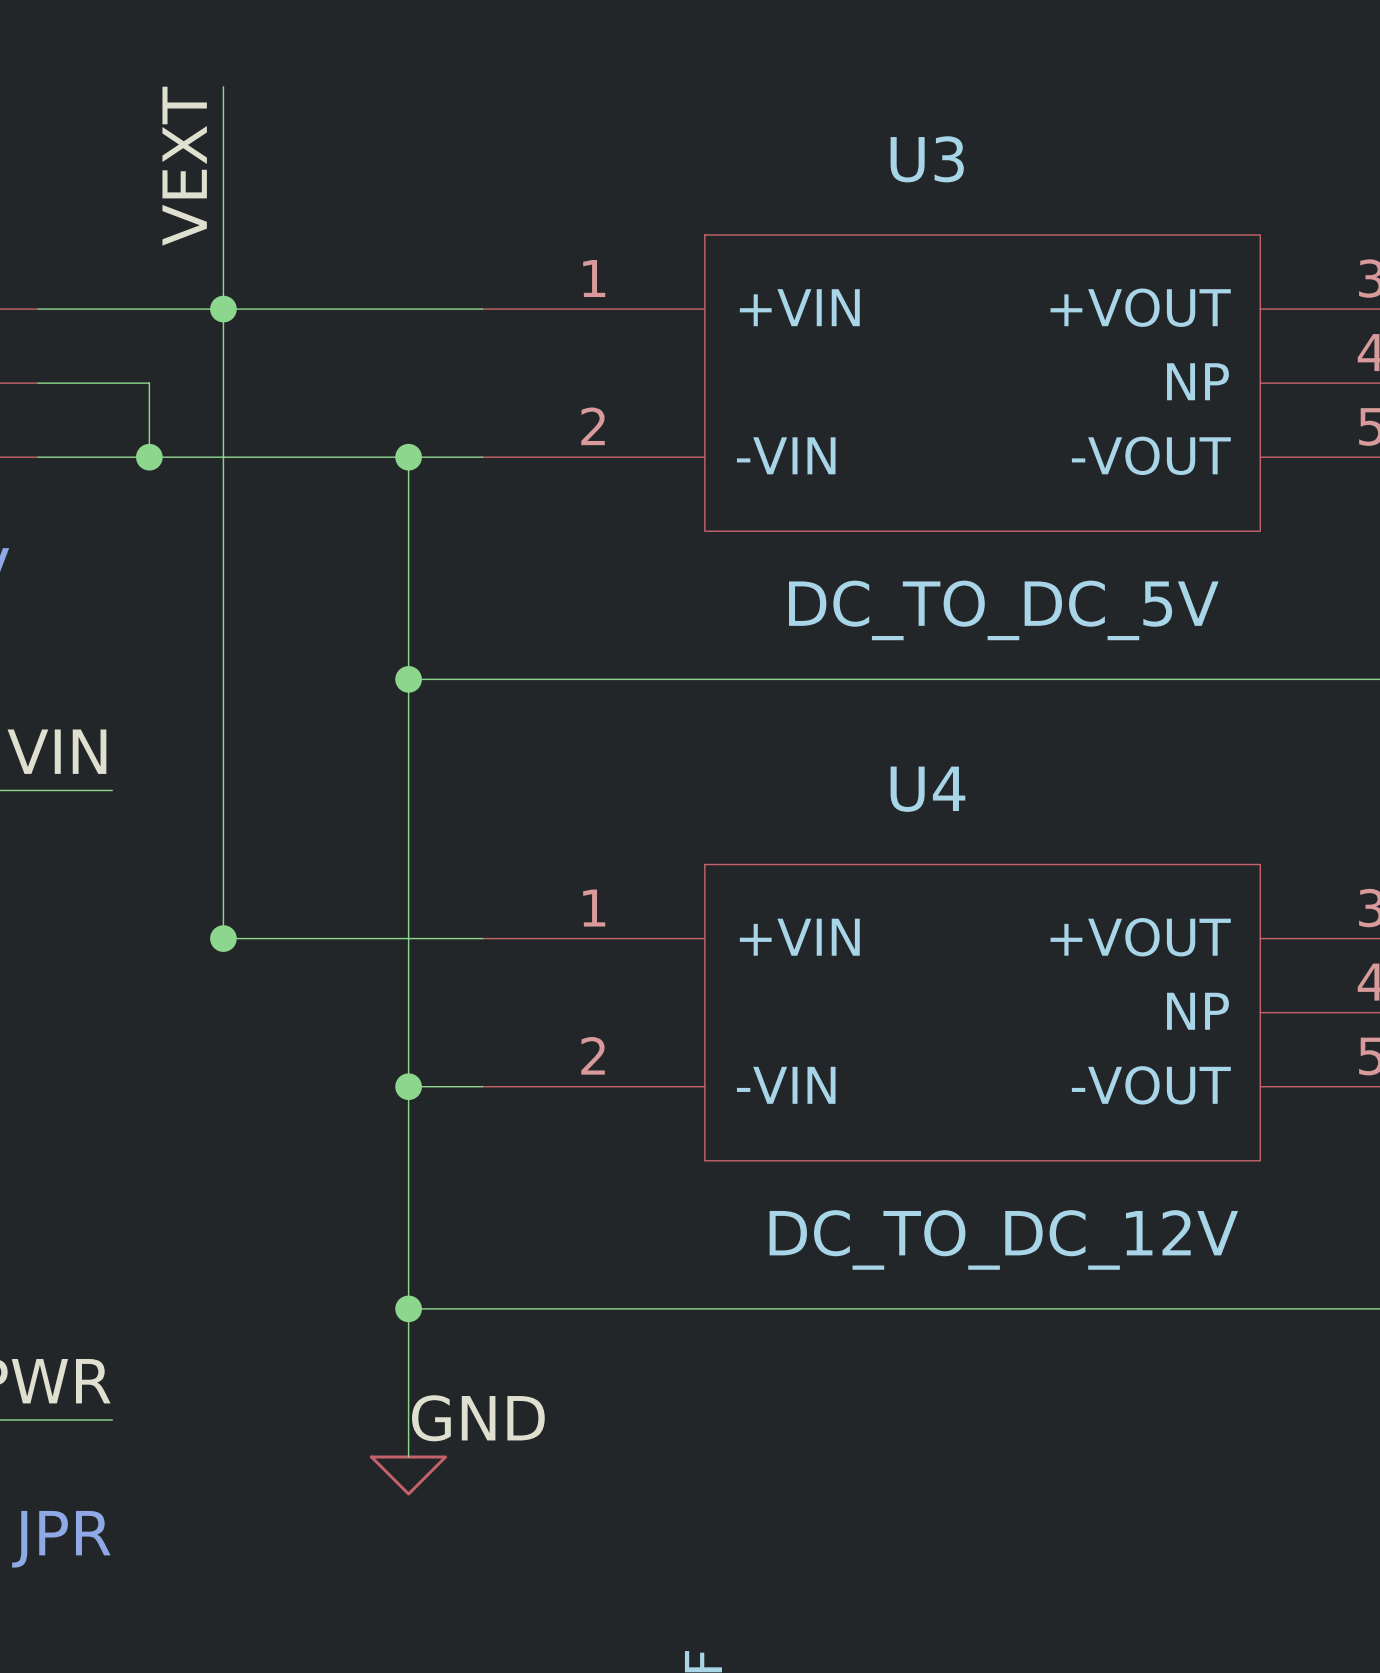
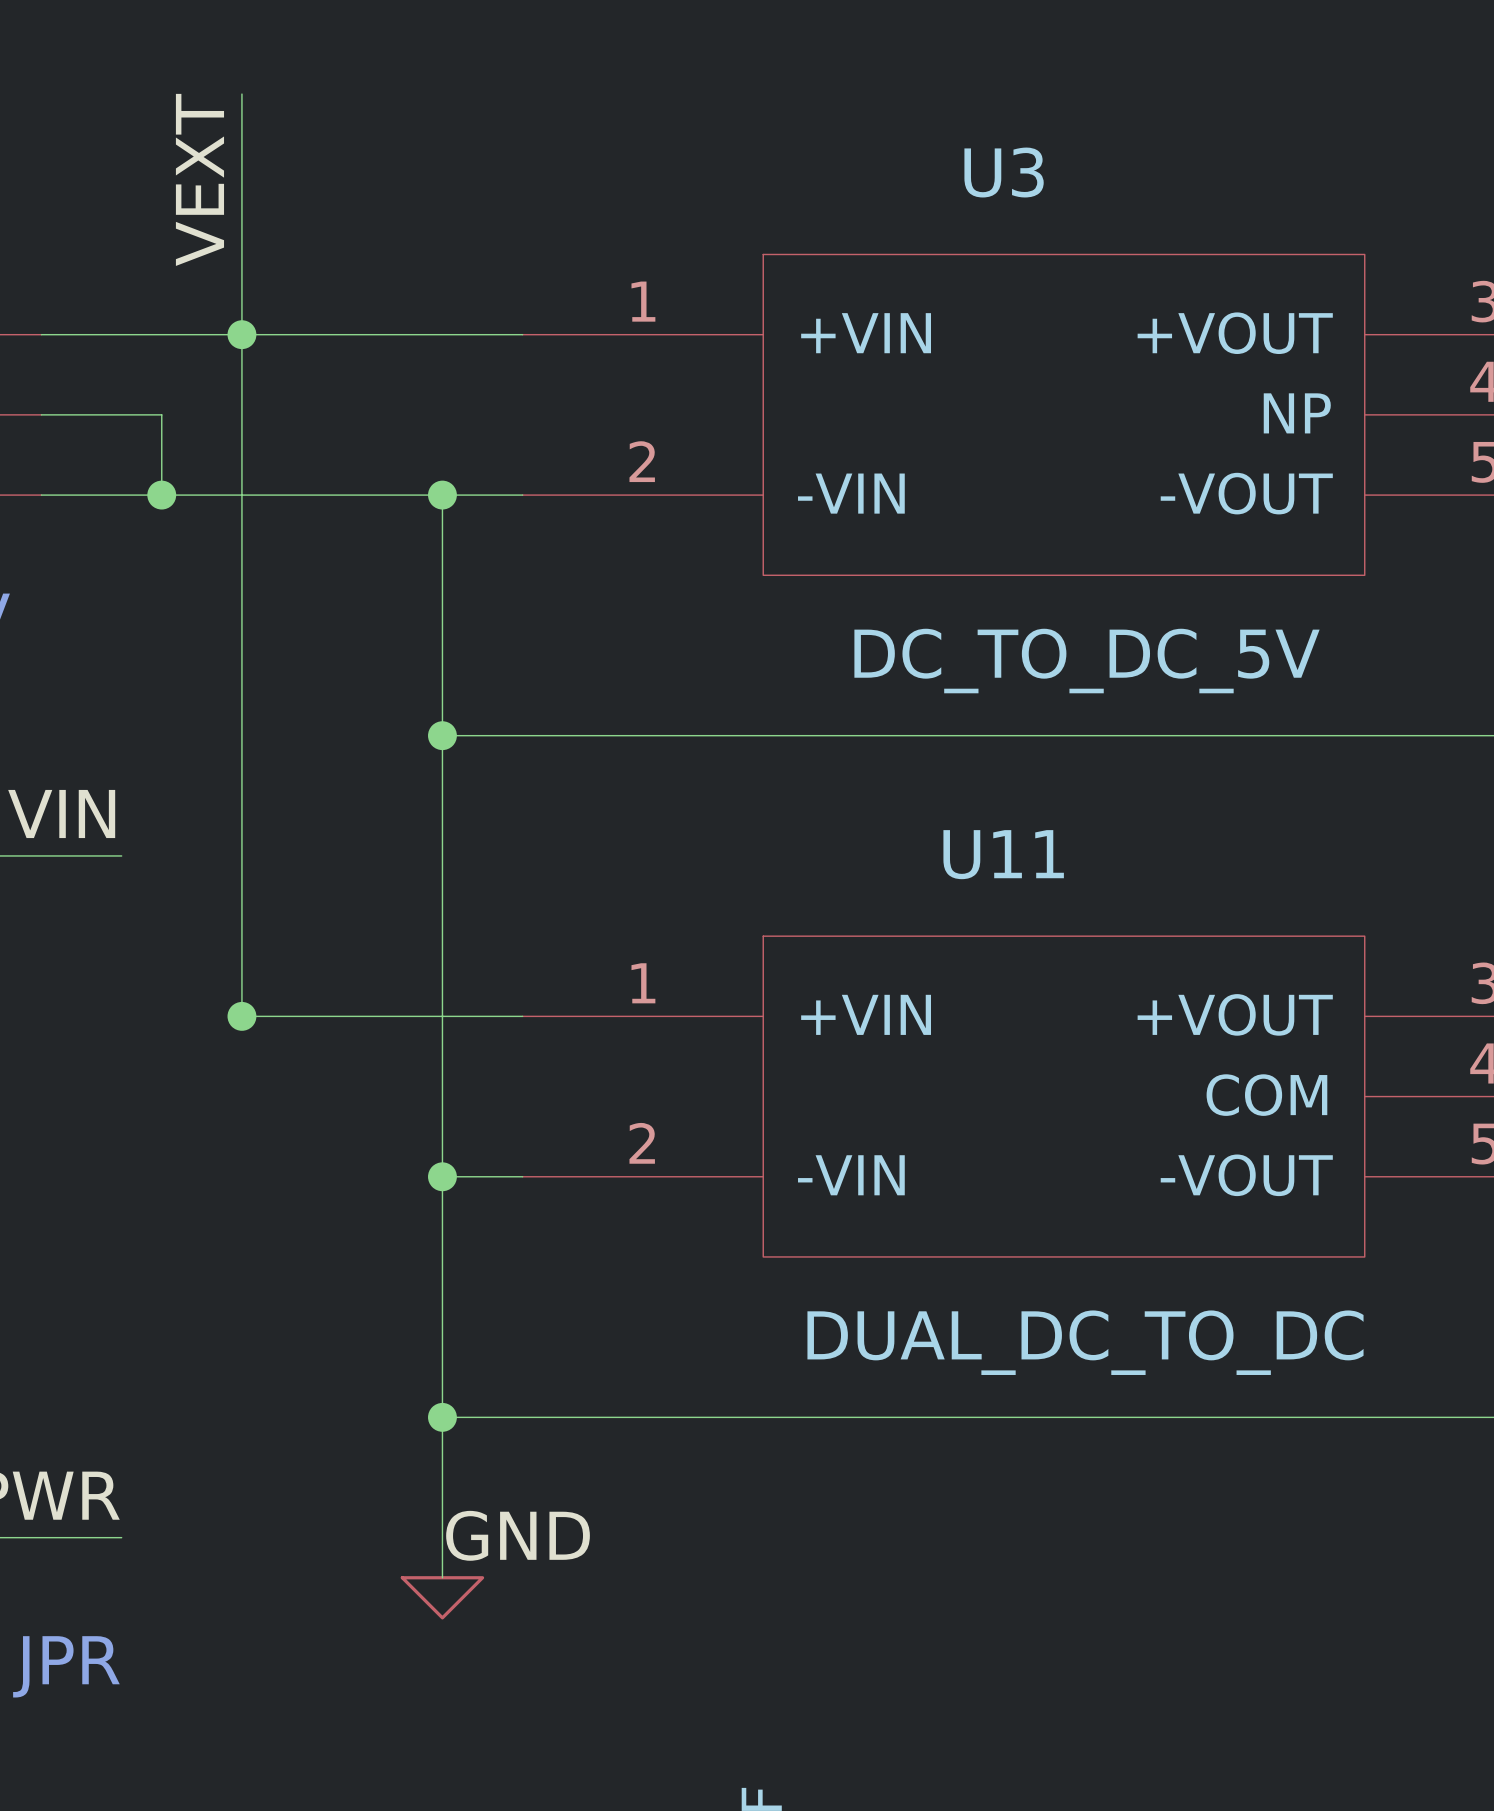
U4 name: U4 (927, 789) -> U11 (1003, 854)
U4 pin name: NP (1197, 1011) -> COM (1266, 1095)
U4 value: DC_TO_DC_12V (1003, 1239) -> DUAL_DC_TO_DC (1085, 1342)

